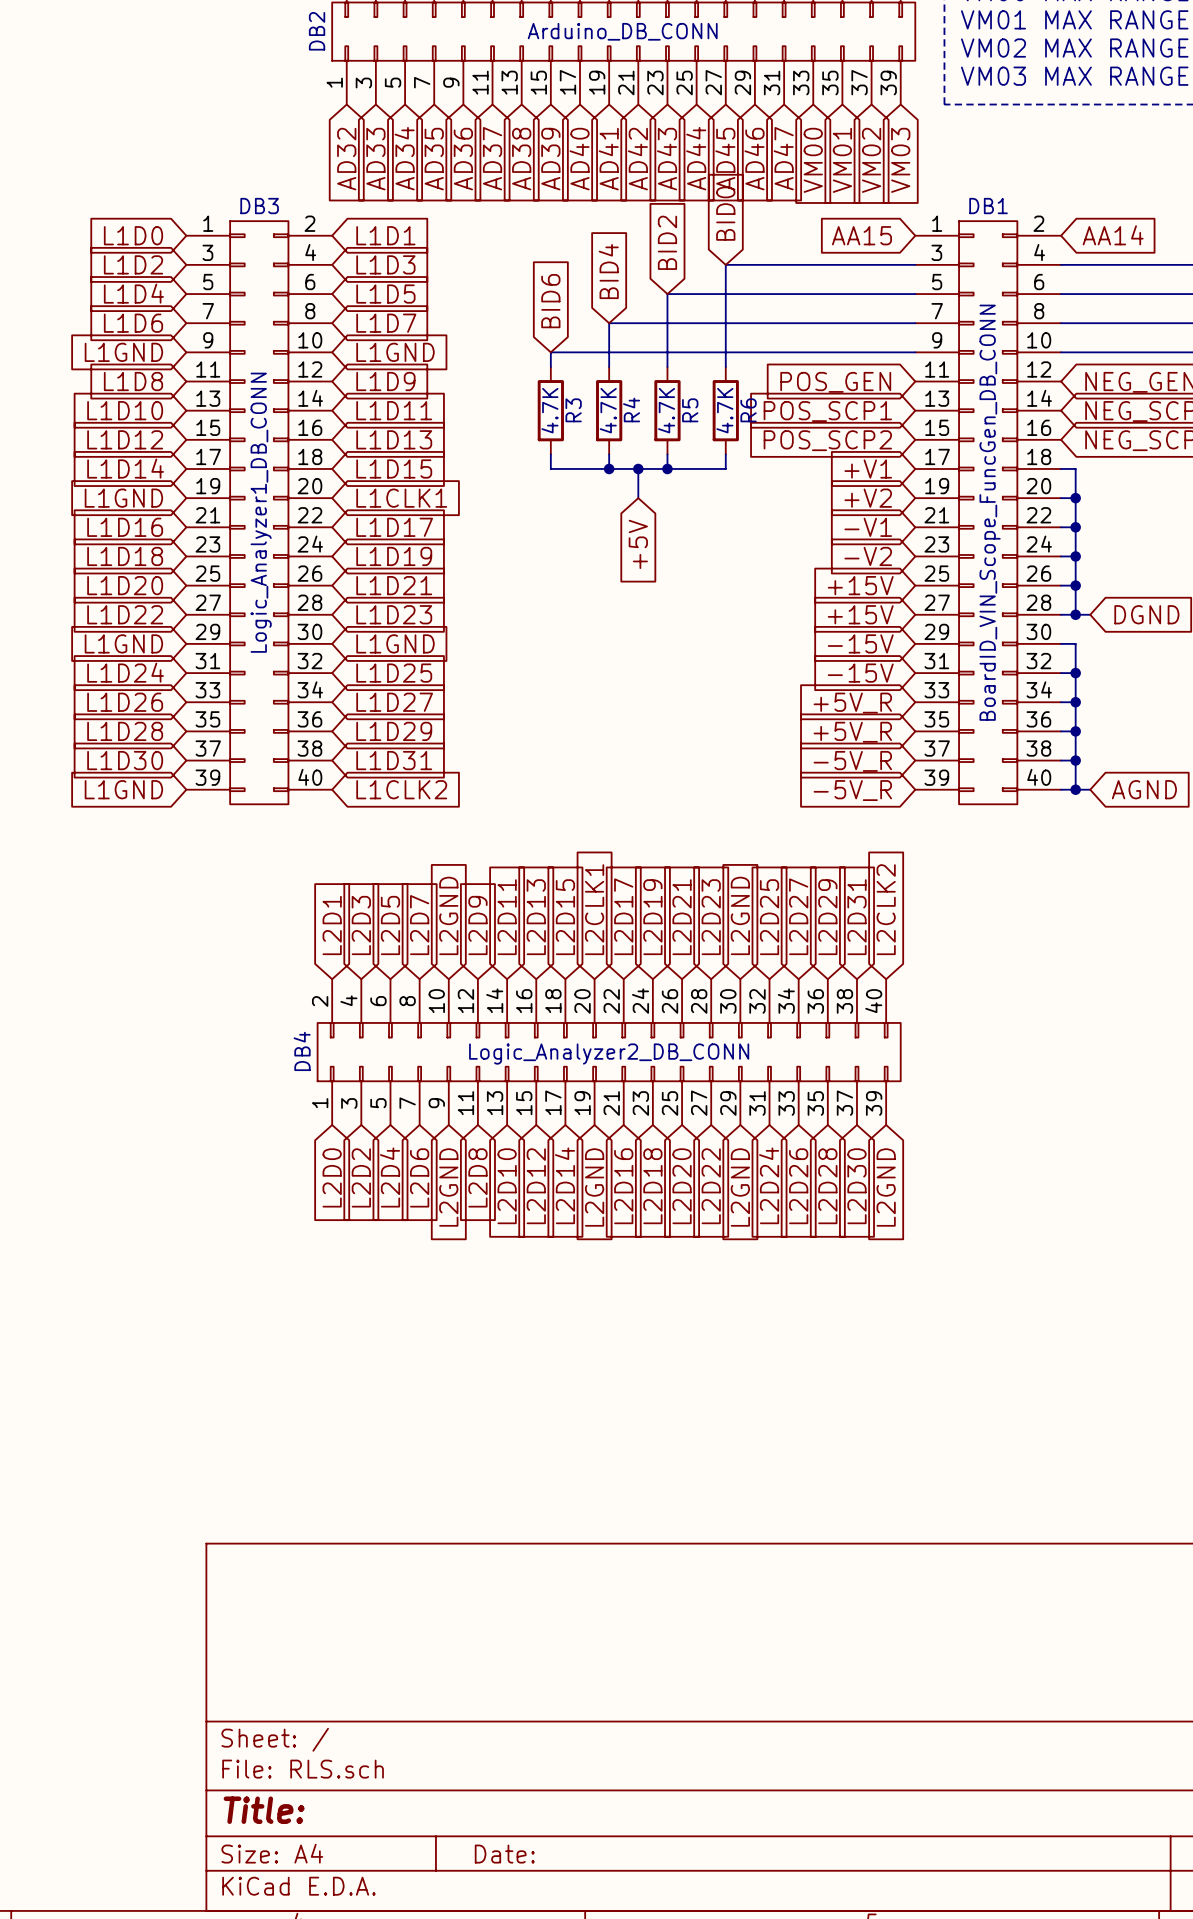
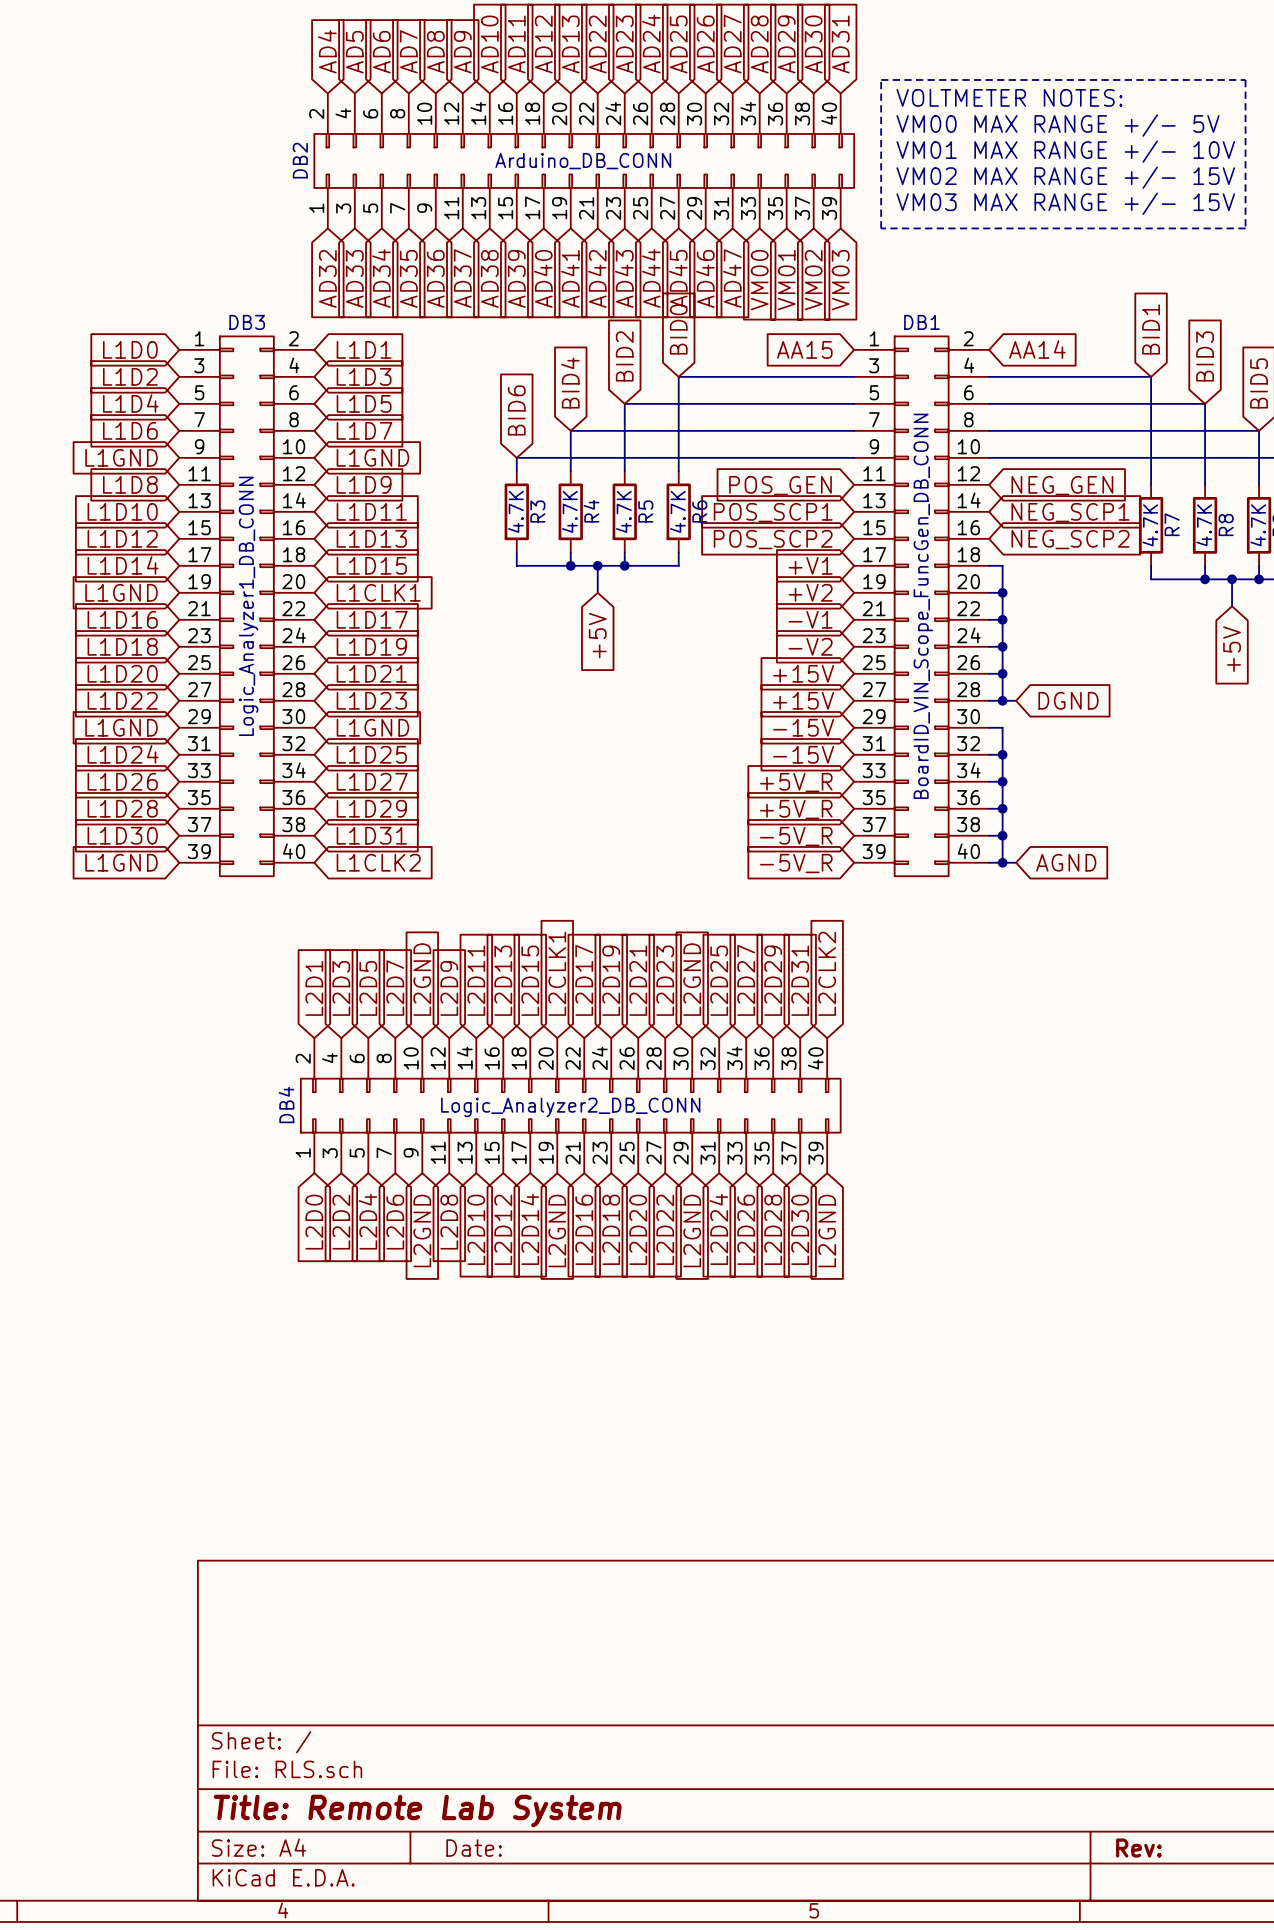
title block: Title: (264, 1810) -> Title: Remote Lab System (417, 1811)

